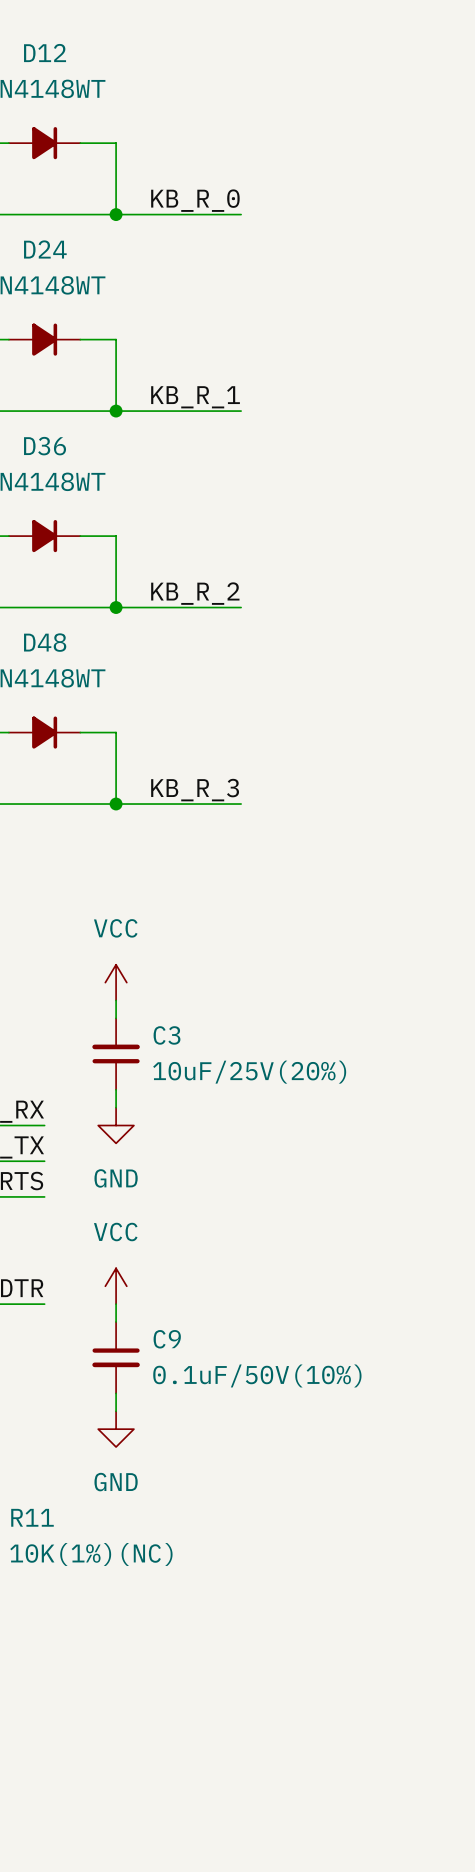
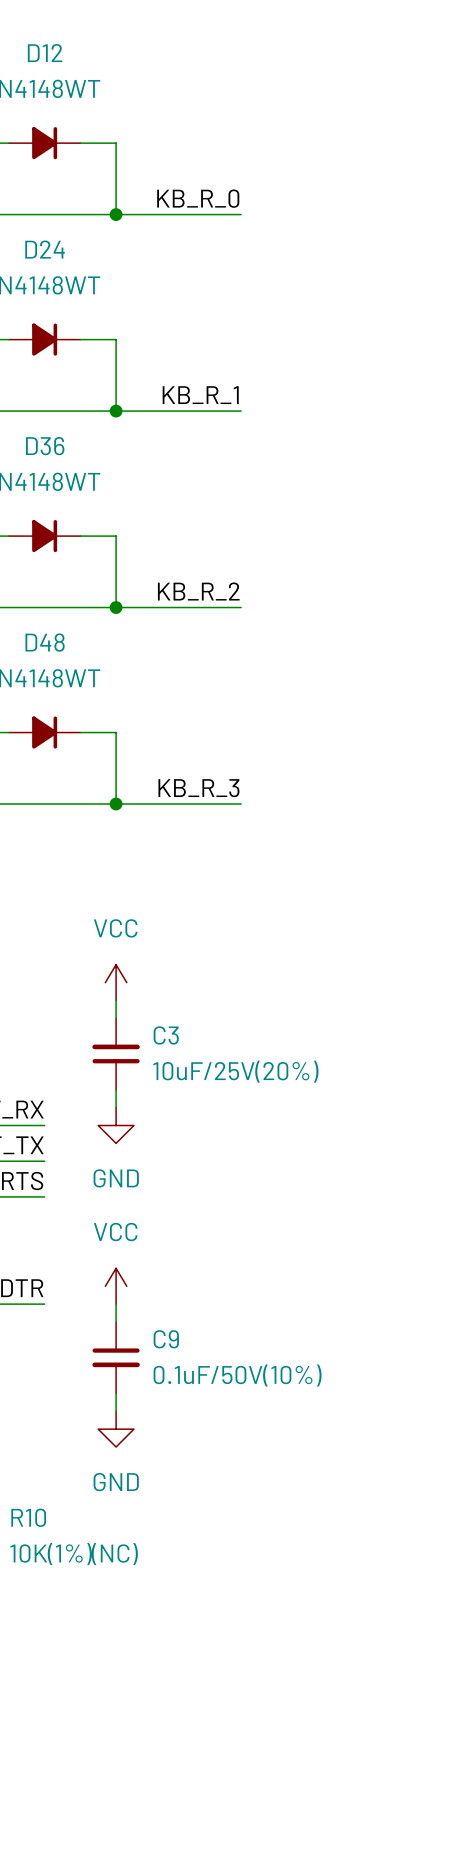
R11 name: R11 (32, 1517) -> R10 (28, 1517)

